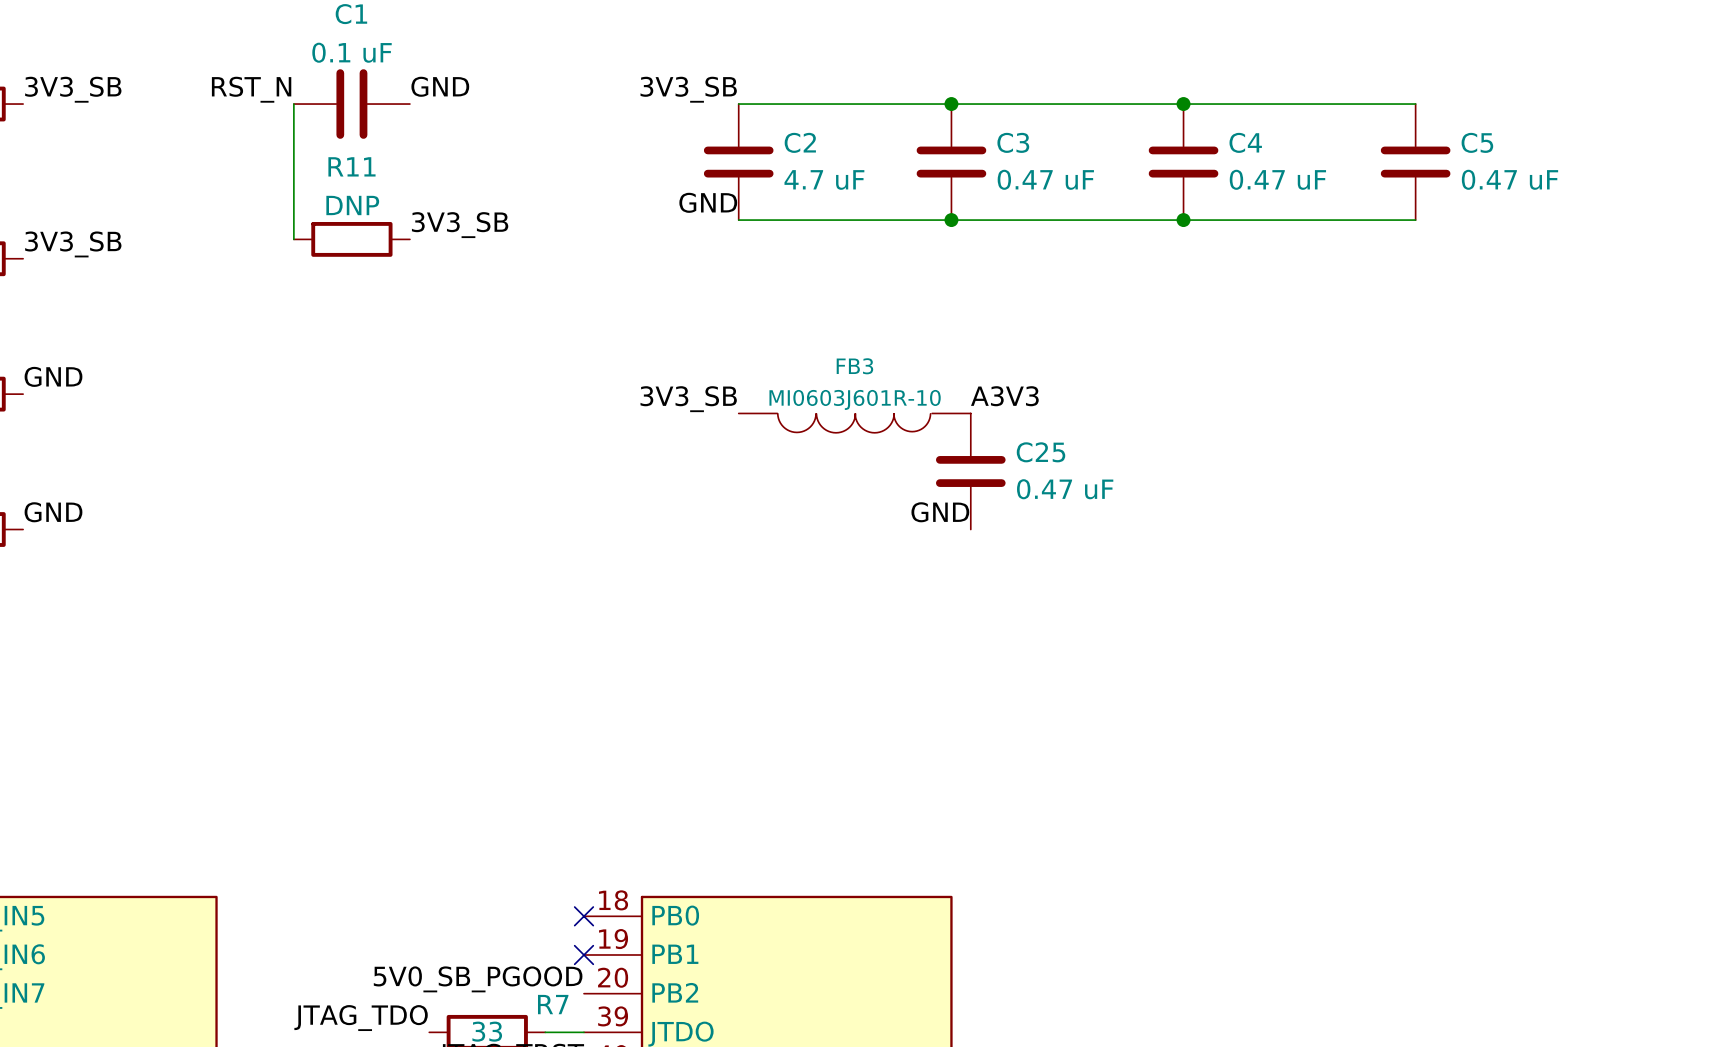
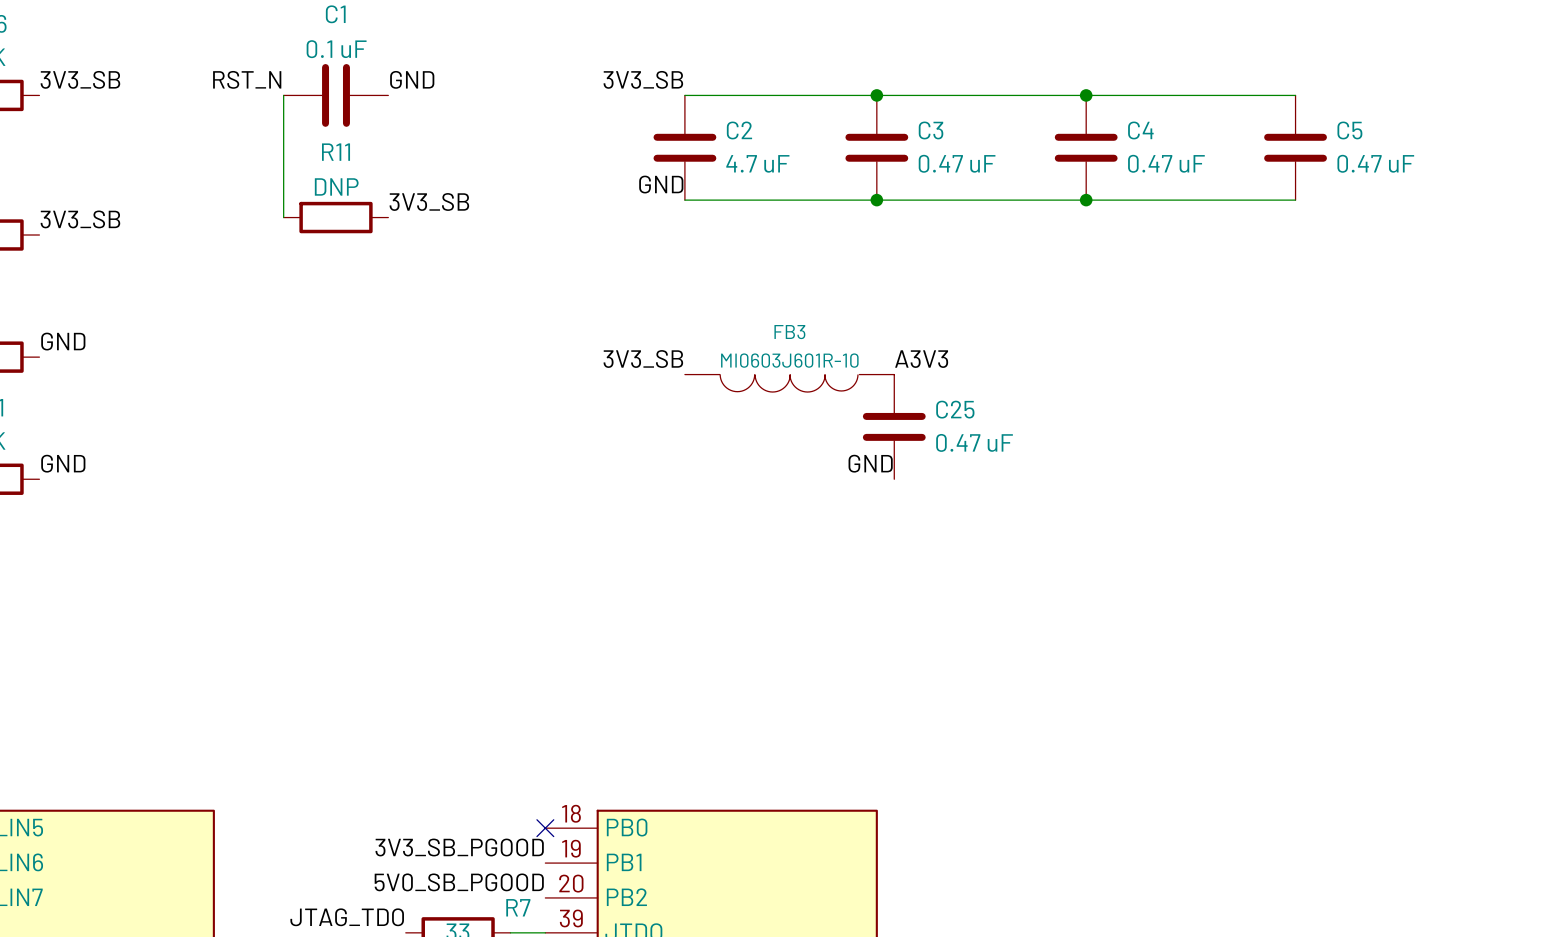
label: none -> 3V3_SB_PGOOD (459, 847)
no-connect mark: (583, 954) -> none

